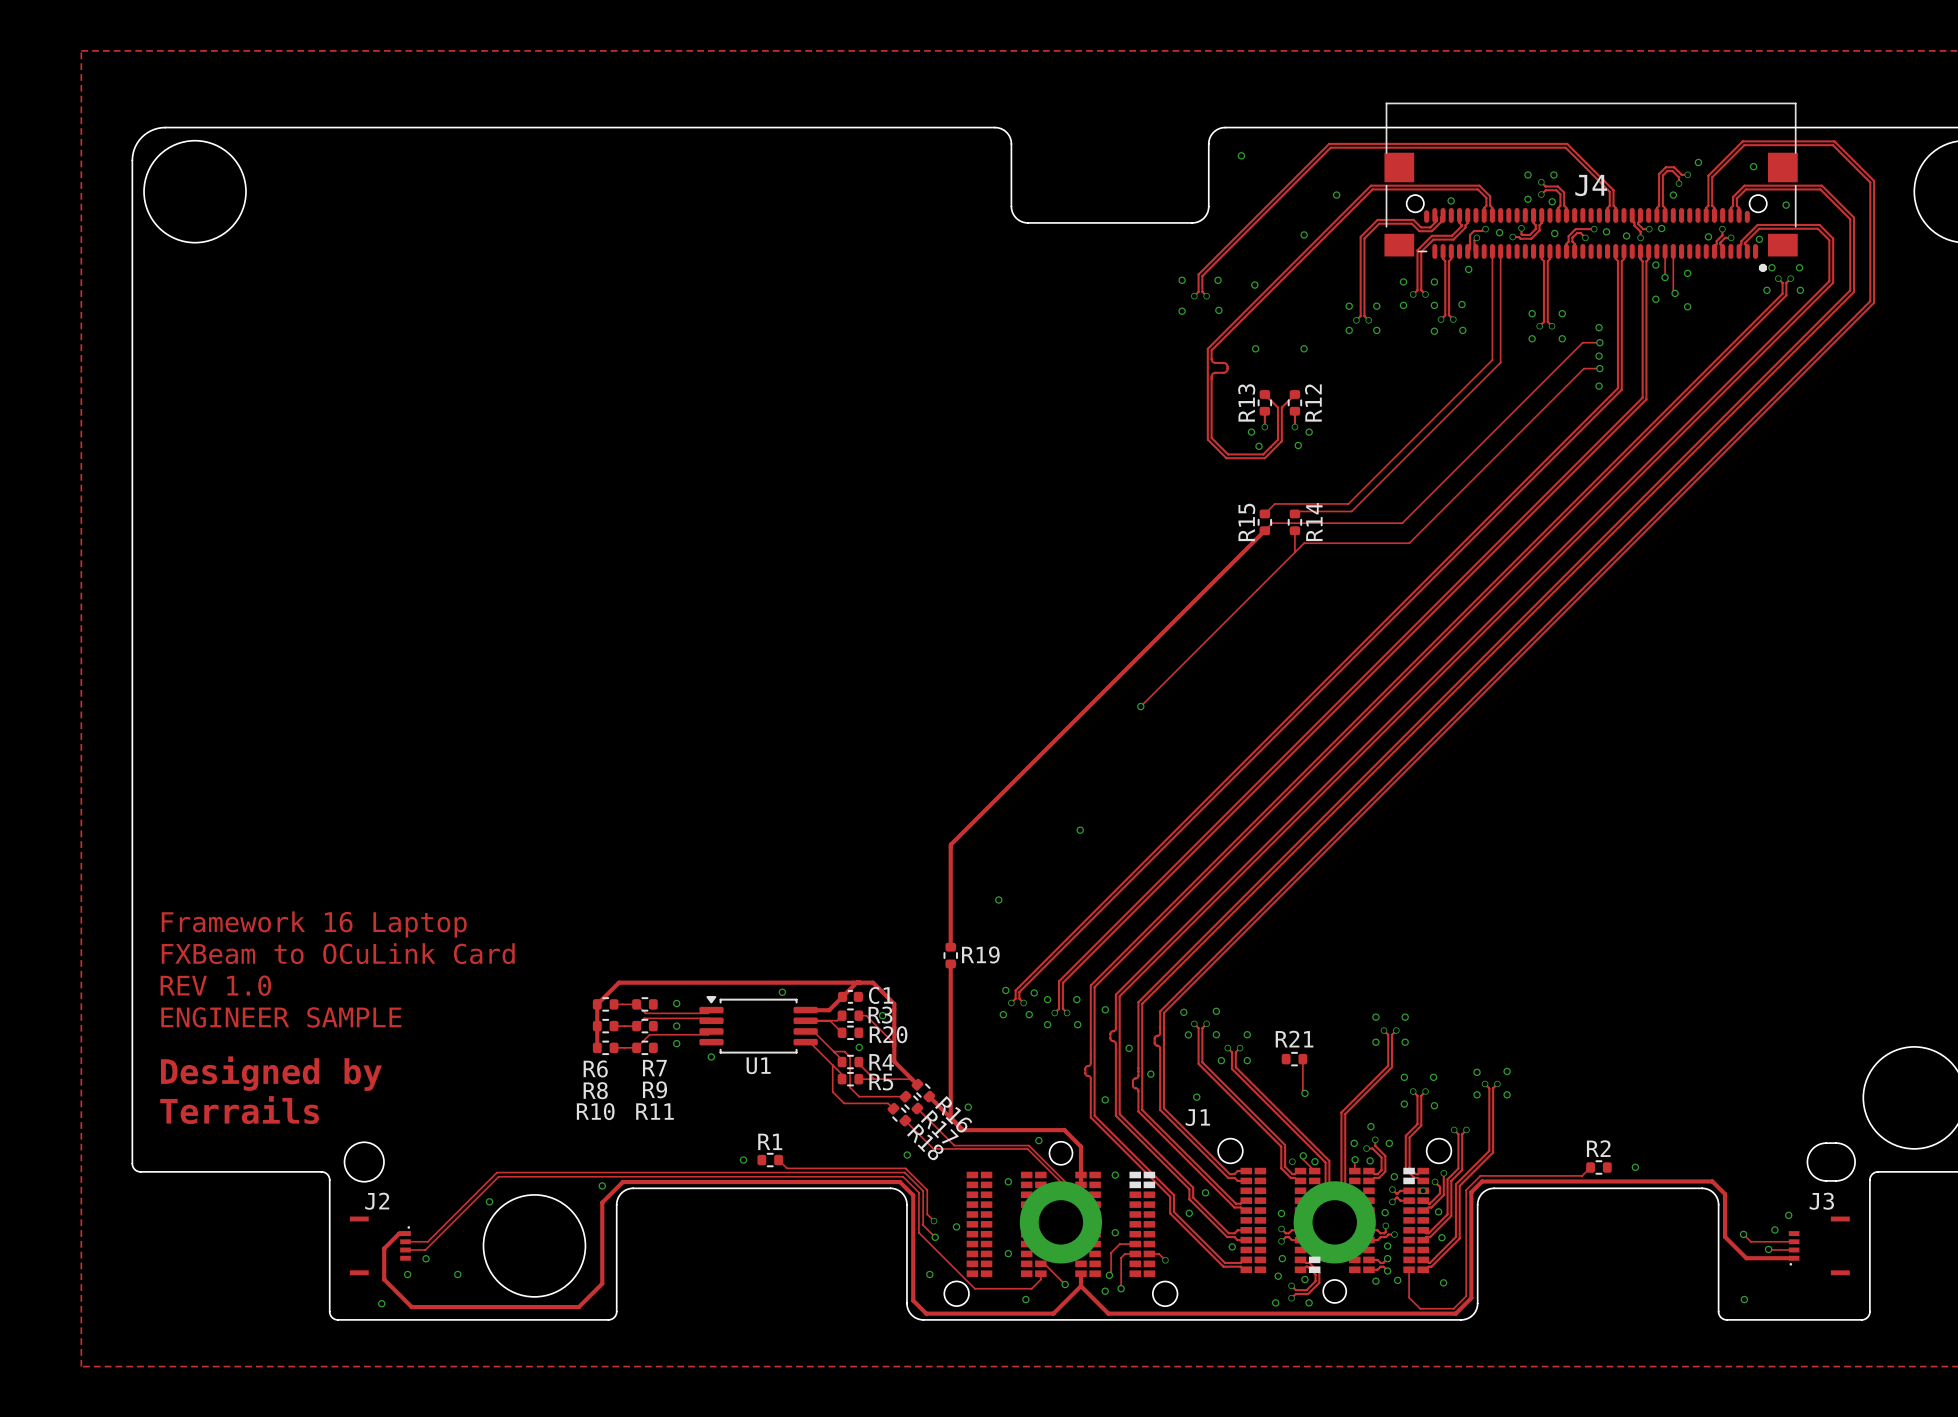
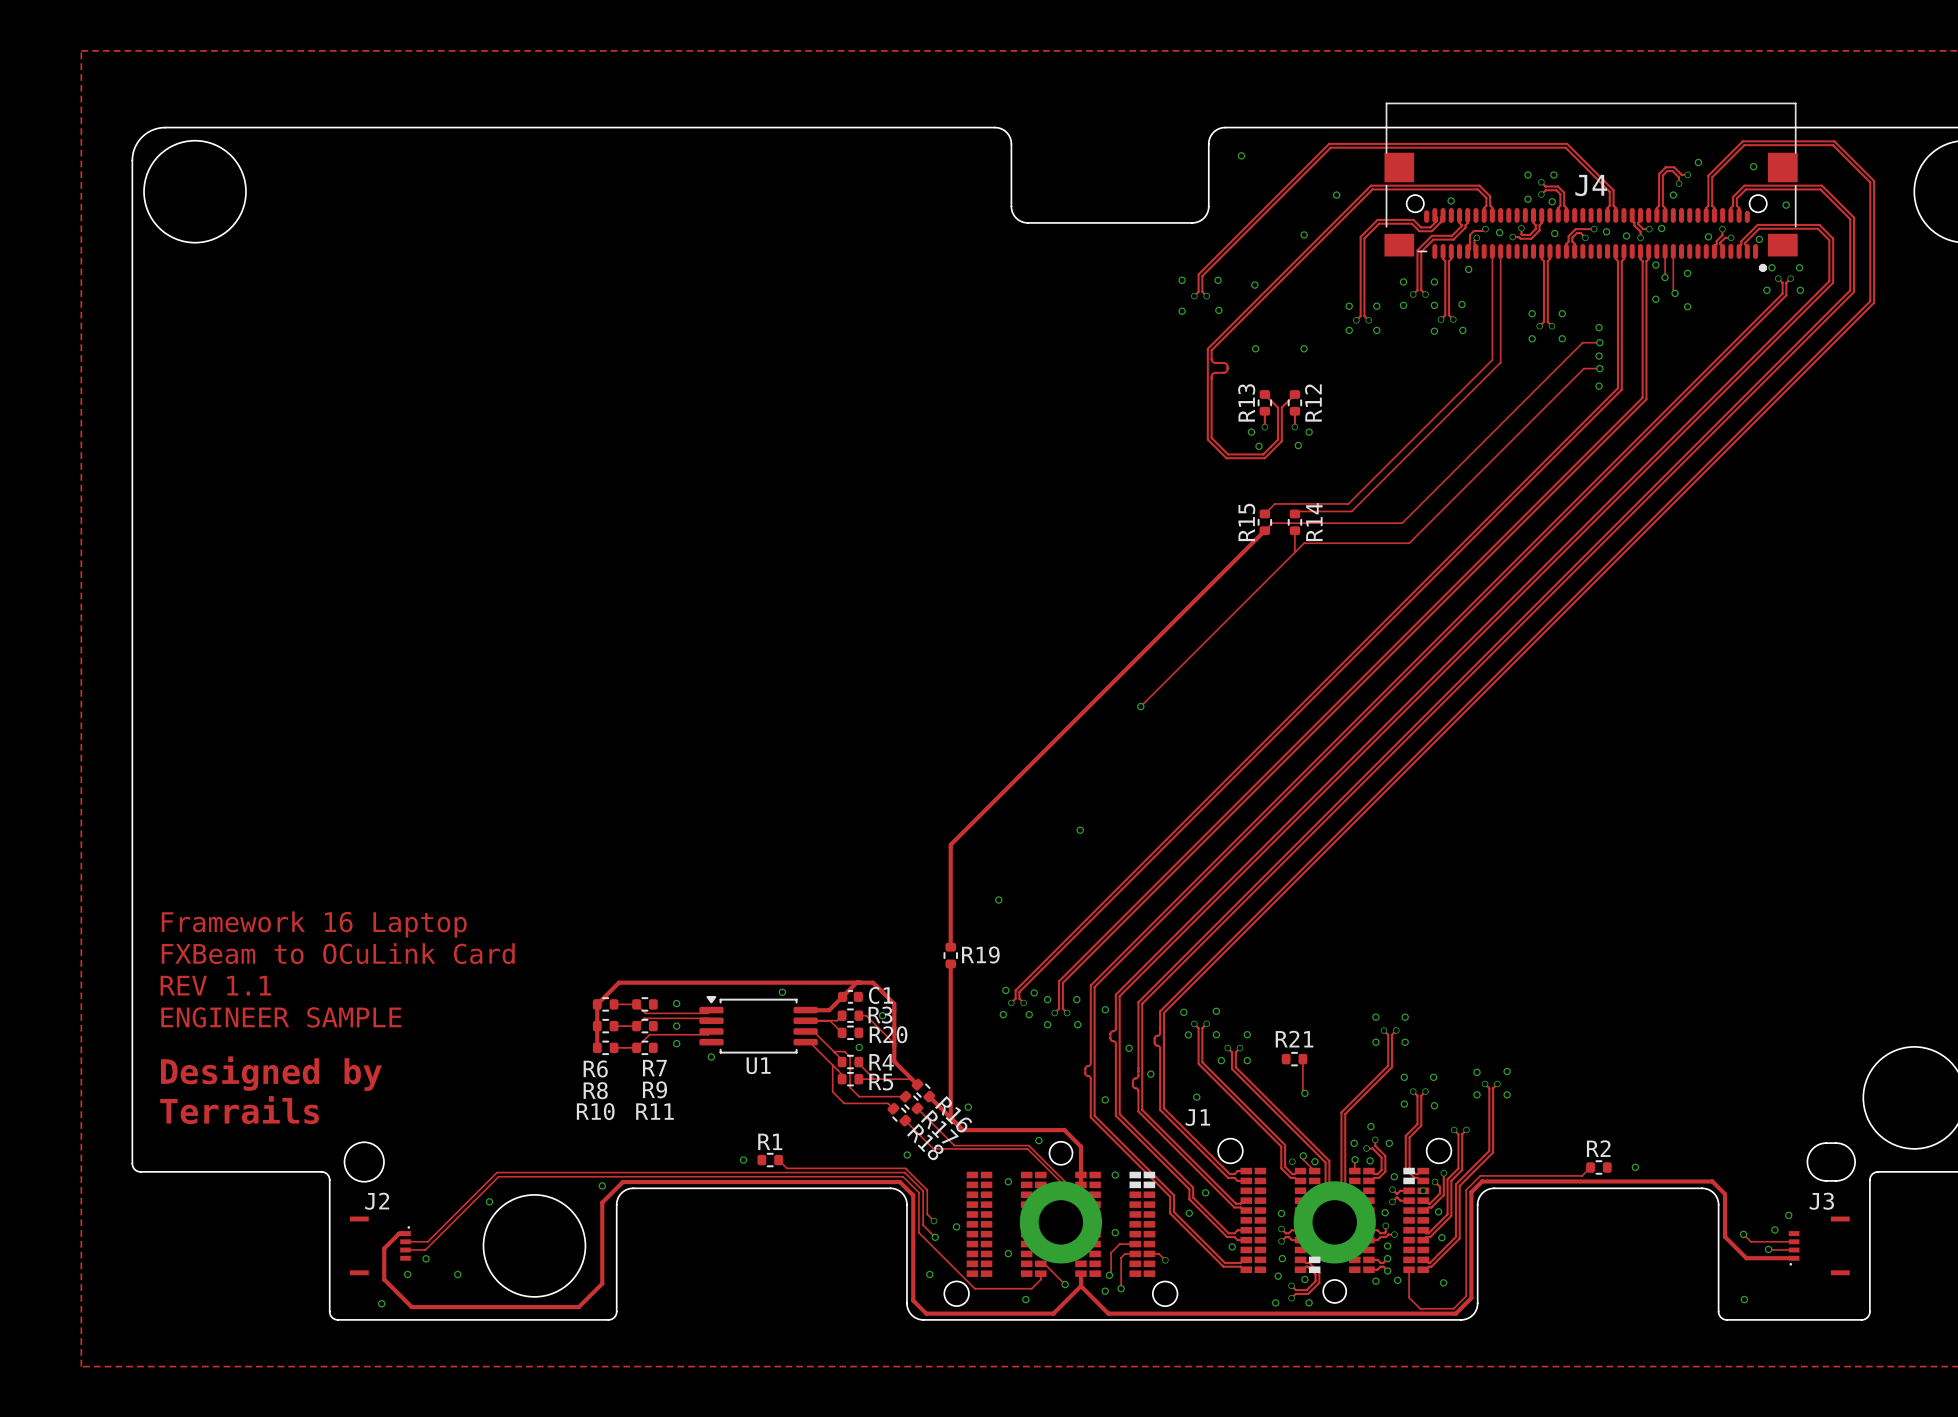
text: REV 1.0 (215, 985) -> REV 1.1 (215, 985)

